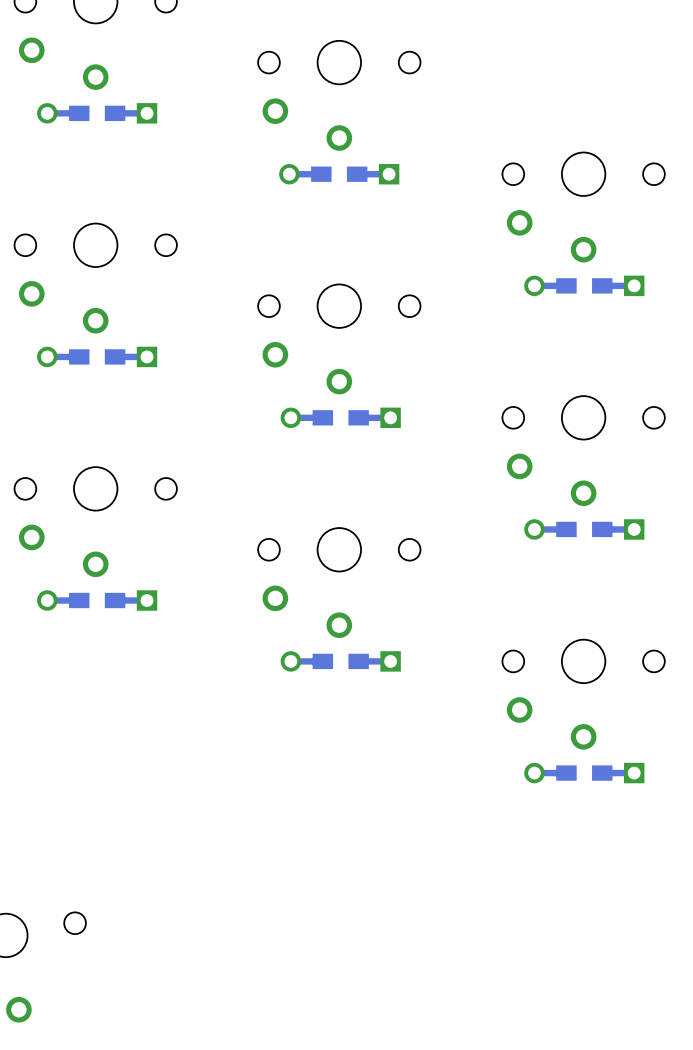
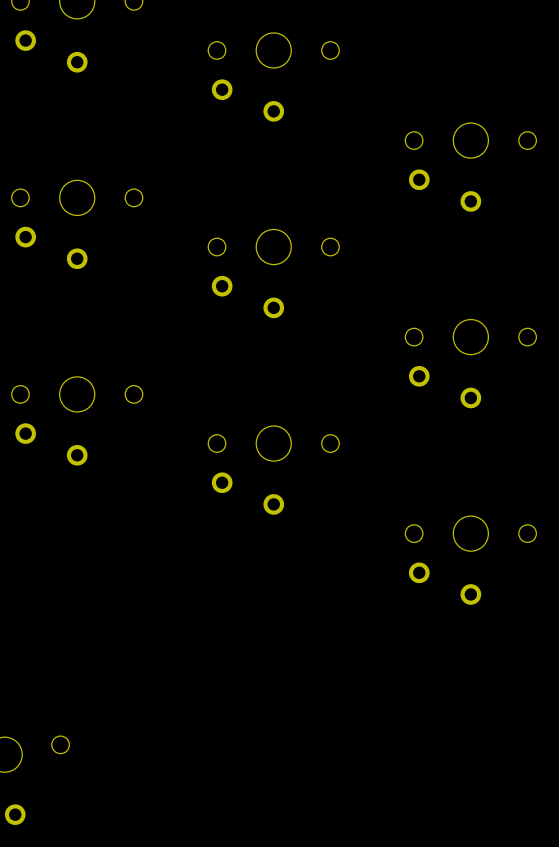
part: (97, 113) -> none
part: (339, 174) -> none
part: (584, 285) -> none
part: (97, 356) -> none
part: (340, 417) -> none
part: (584, 529) -> none
part: (97, 600) -> none
part: (340, 661) -> none
part: (584, 773) -> none

